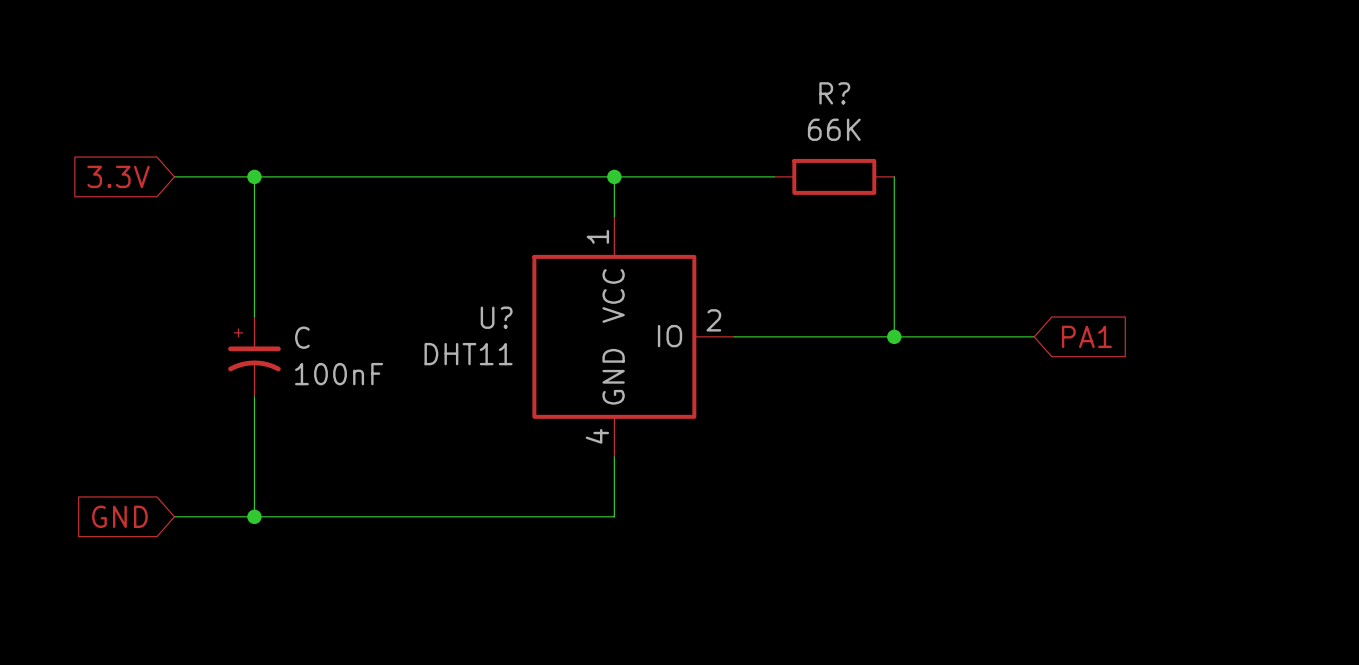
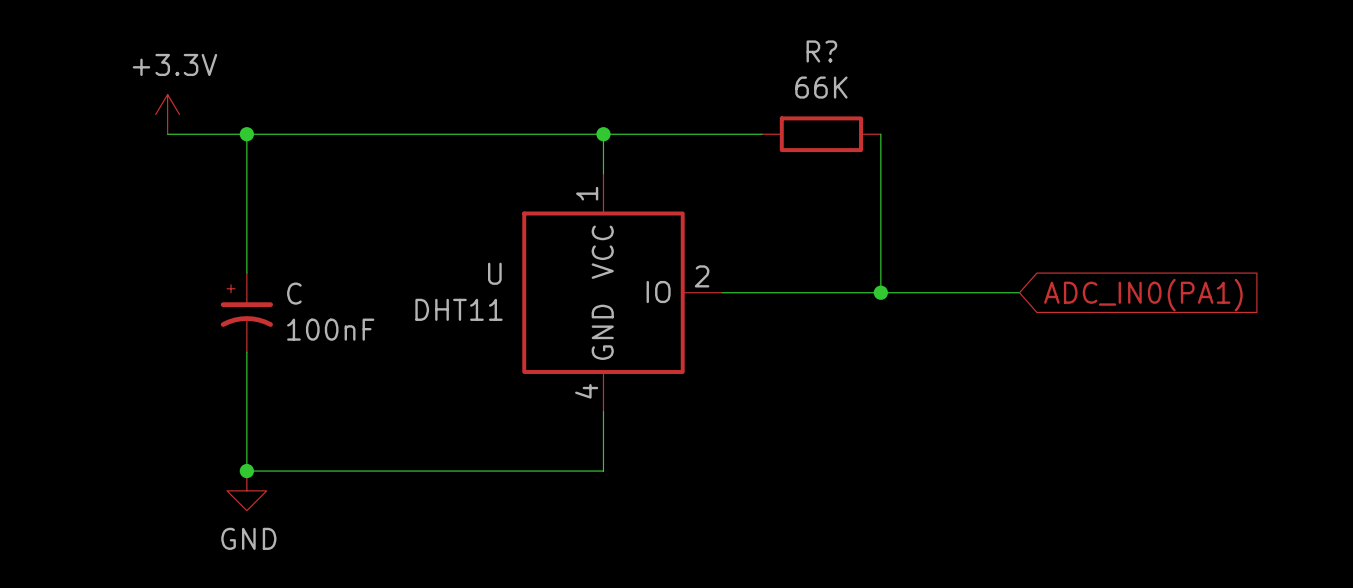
power symbol: none -> +3.3V (167, 114)
global label: 3.3V (118, 176) -> none
U? name: U? (496, 317) -> U (494, 273)
global label: PA1 (1086, 336) -> ADC_IN0(PA1) (1143, 295)
global label: GND (119, 516) -> none
wire: (174, 516) (254, 516) -> none
power symbol: none -> GND (246, 490)

